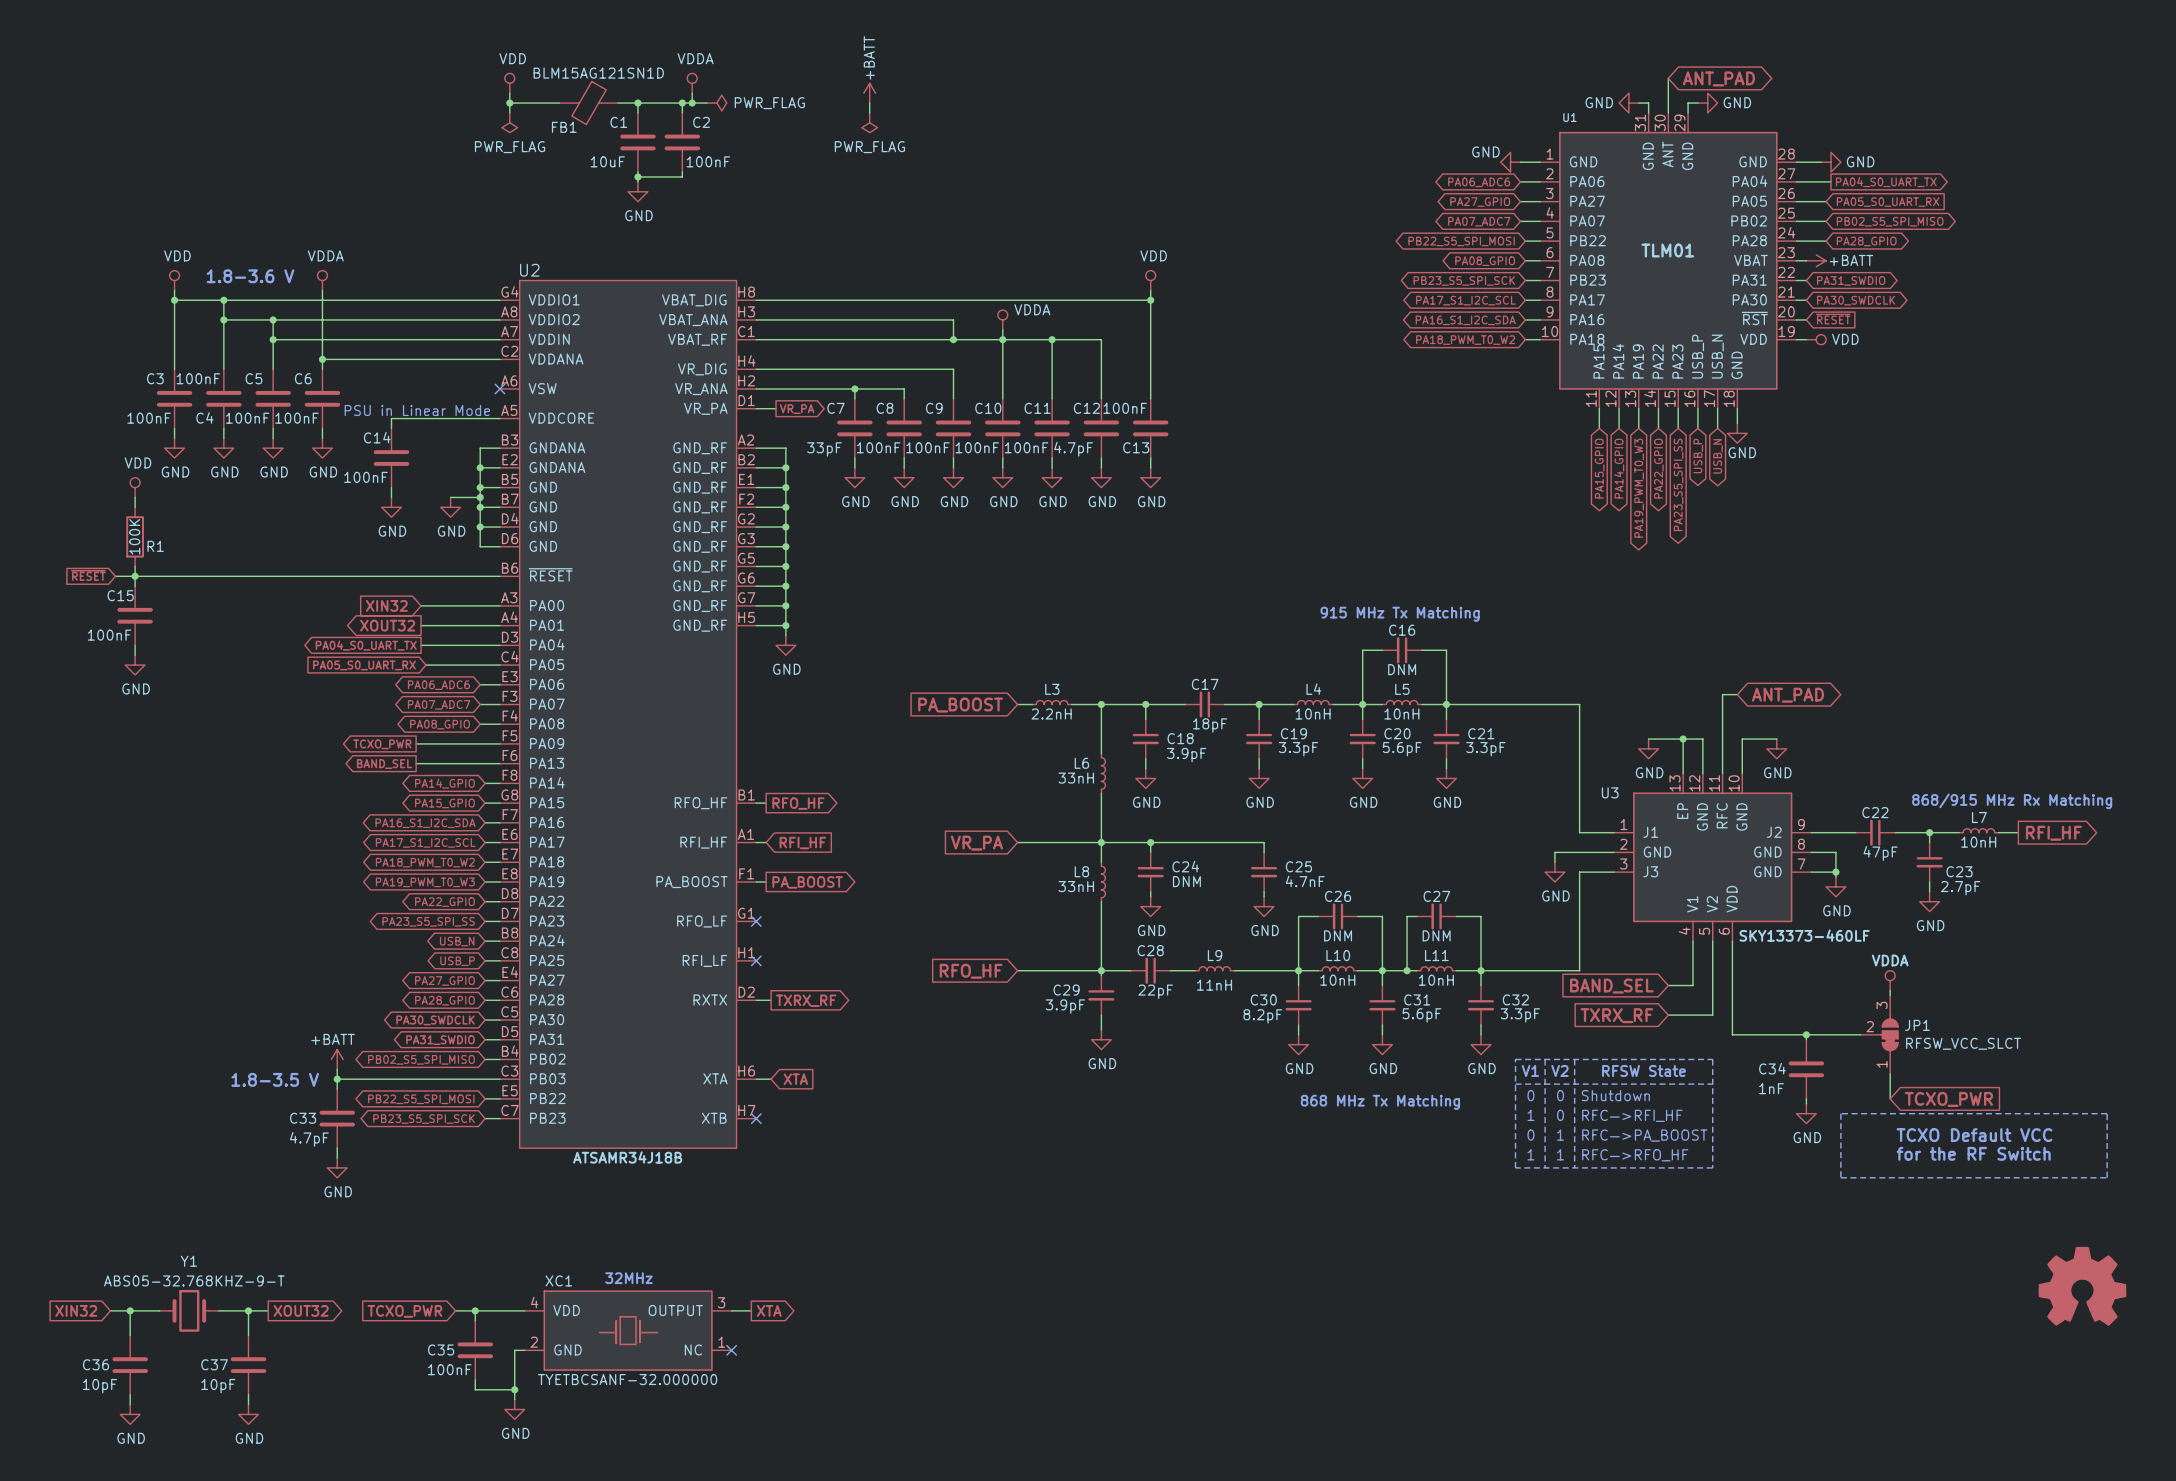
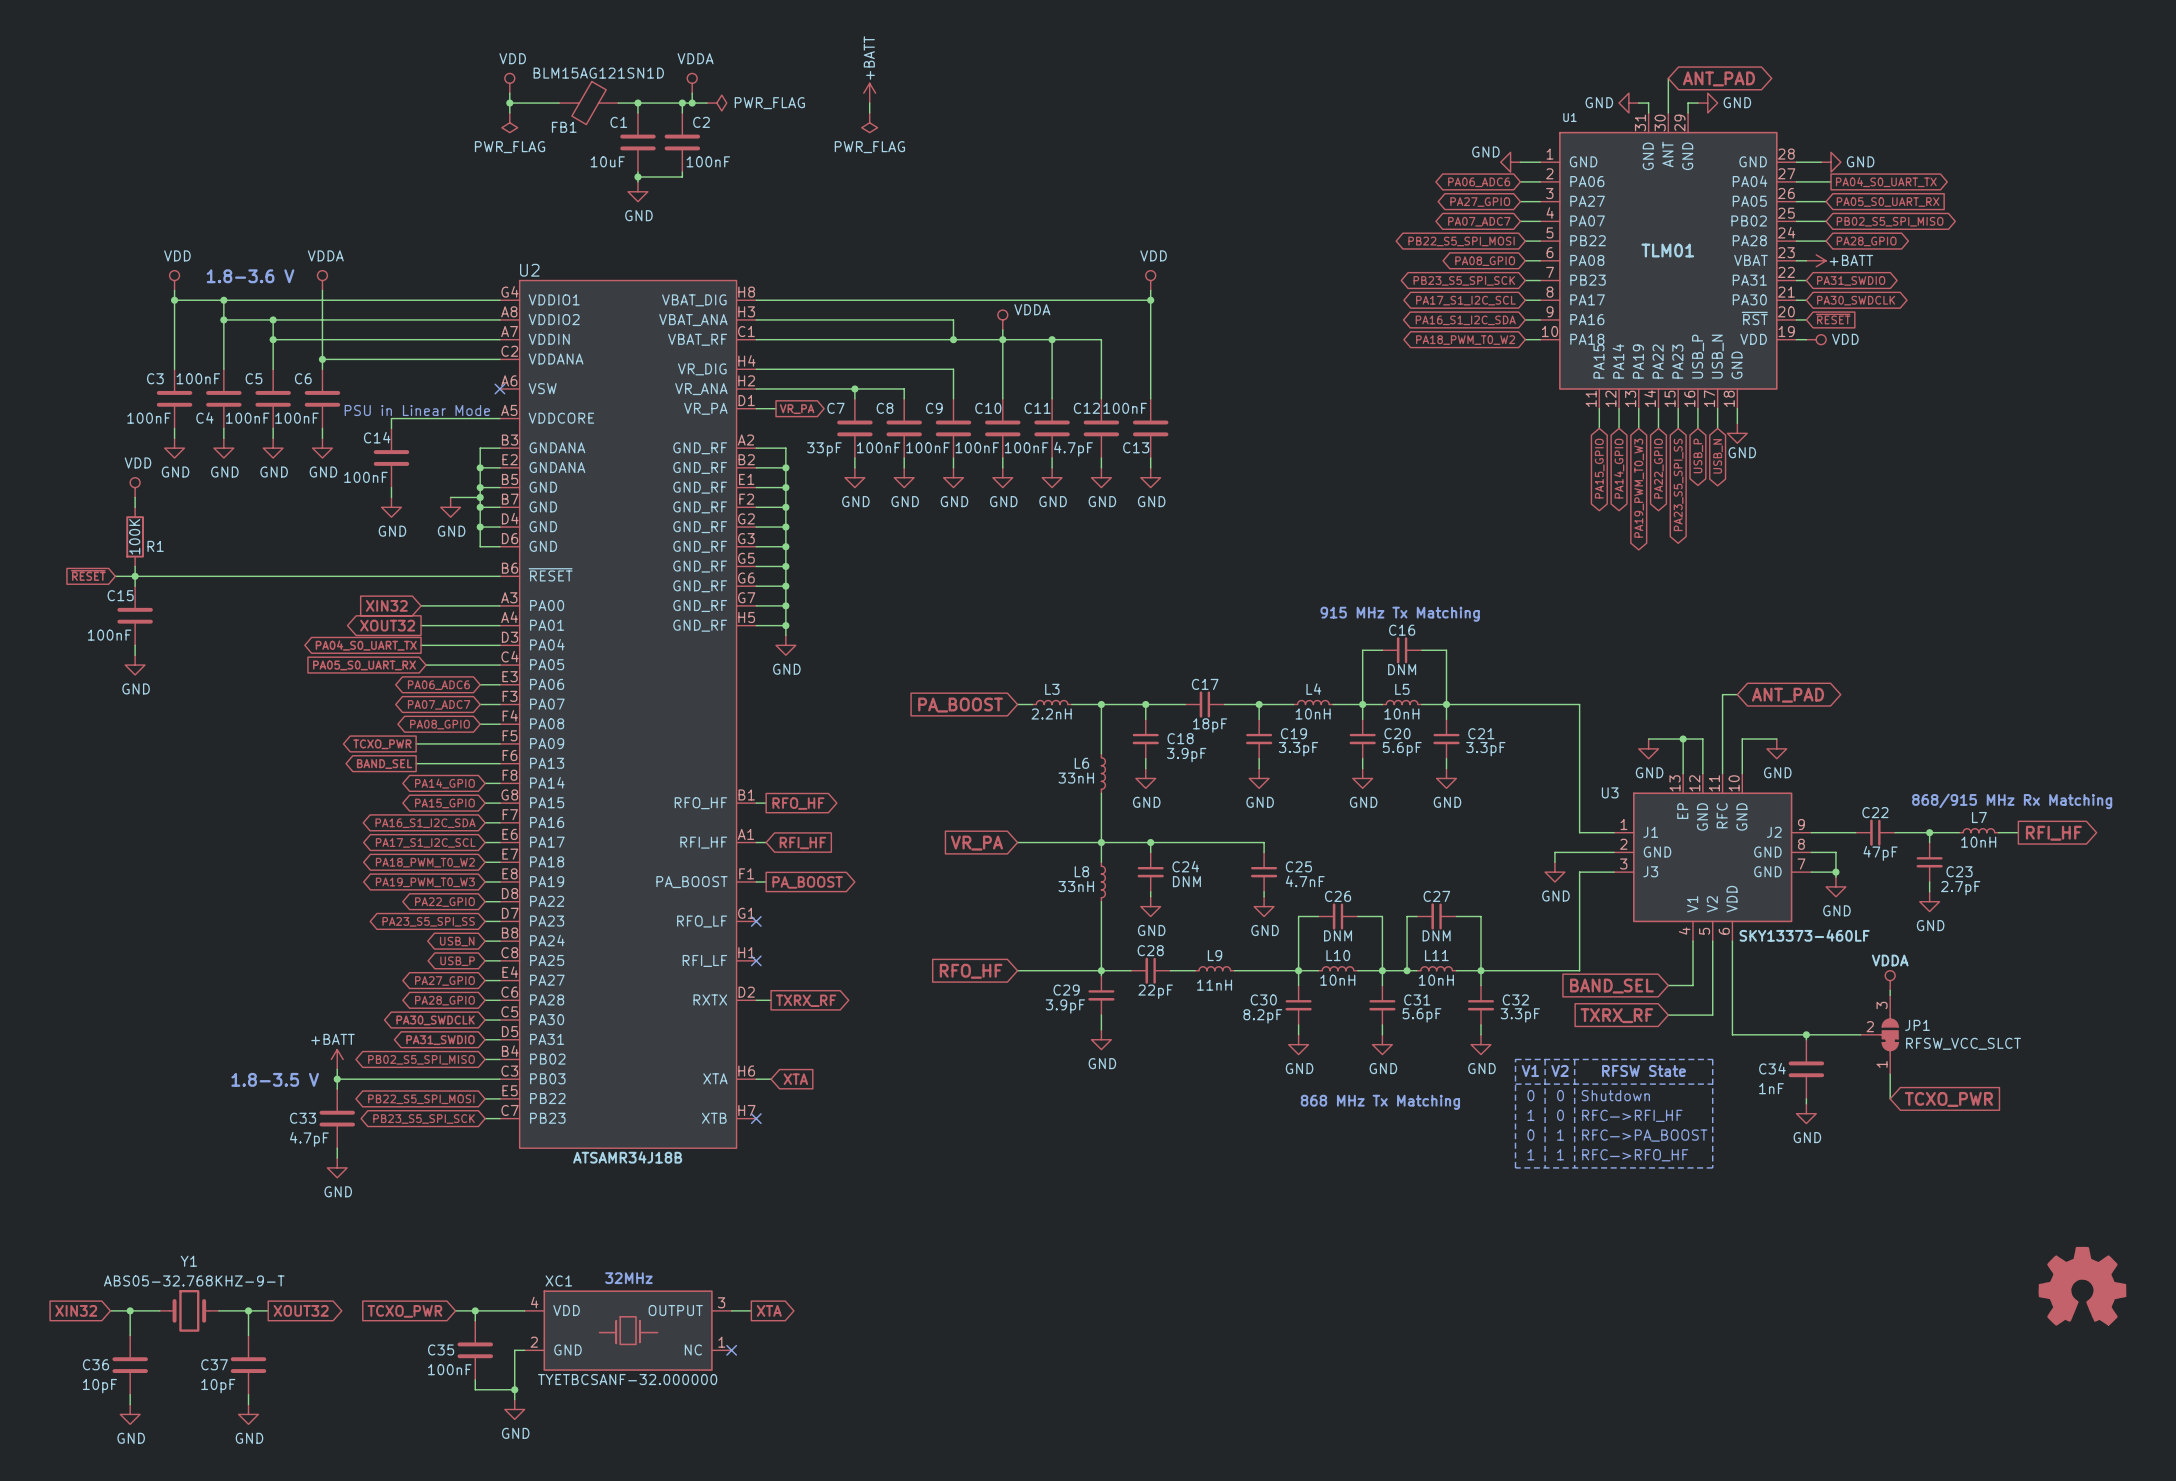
line: (1840, 1113) (2107, 1113) (2107, 1177) (1840, 1177) (1840, 1113) -> none
text: TCXO Default VCC (1974, 1135) -> none
text: for the RF Switch (1973, 1153) -> none

